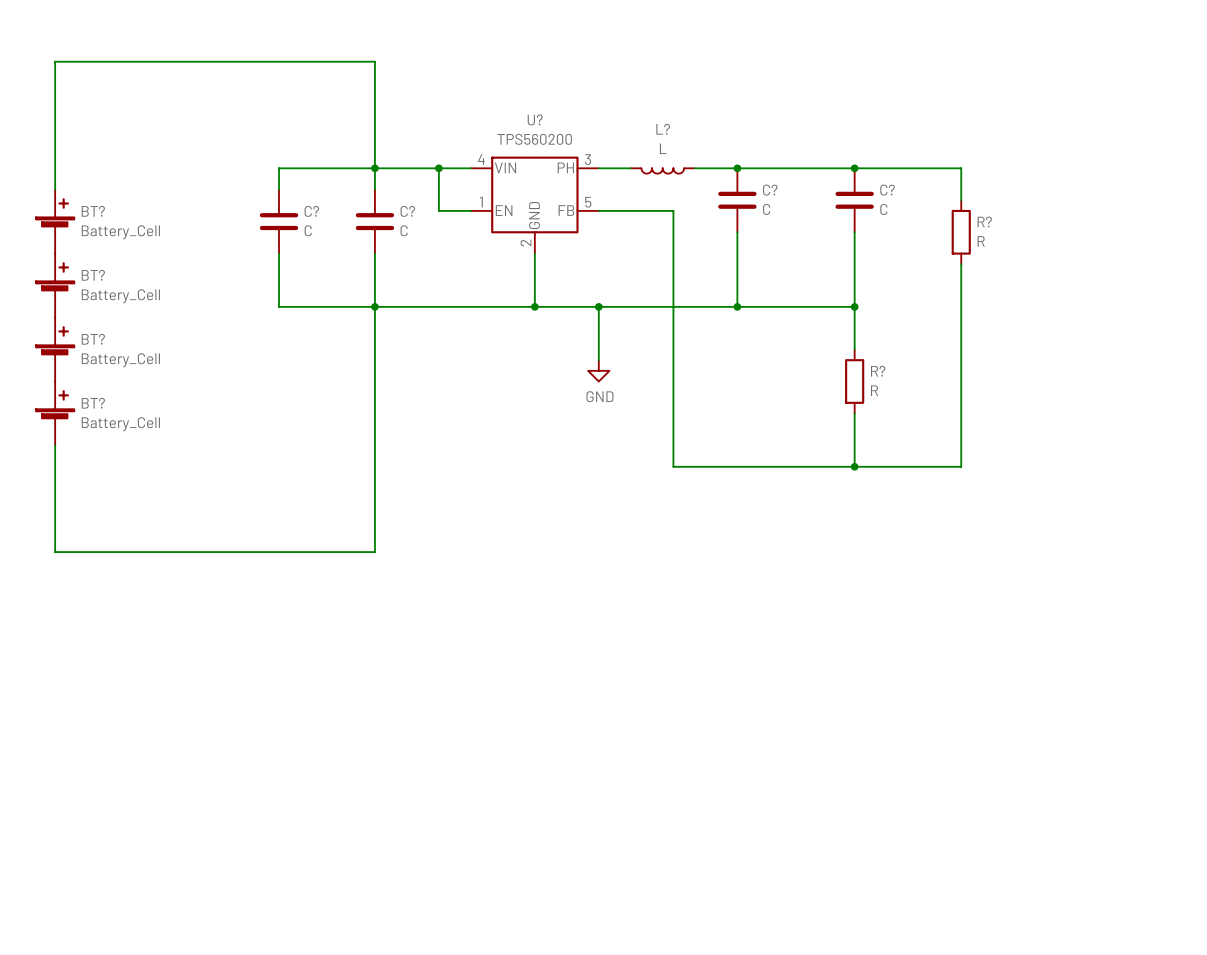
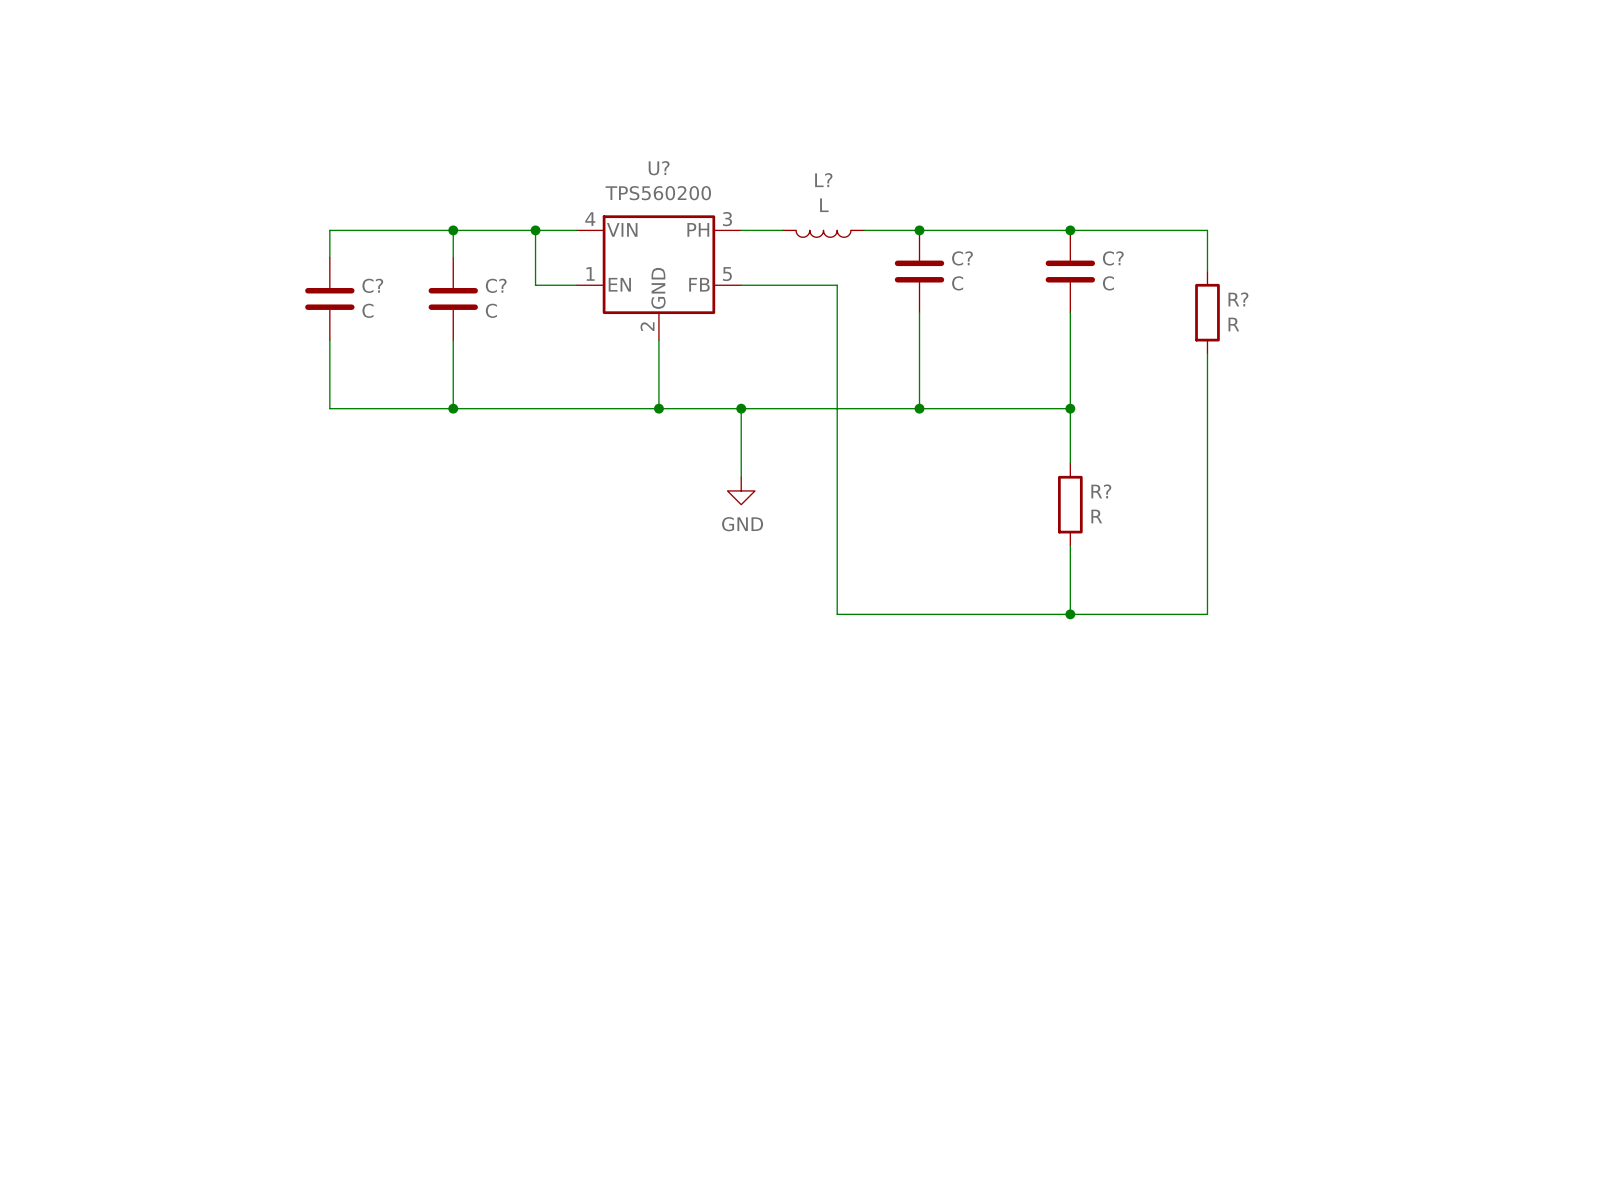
wire: (374, 168) (374, 61) (55, 61) (55, 189) -> none
BT?: Battery_Cell (55, 221) -> none
BT?: Battery_Cell (55, 285) -> none
wire: (374, 306) (374, 552) (55, 552) (55, 445) -> none
BT?: Battery_Cell (55, 349) -> none
BT?: Battery_Cell (55, 413) -> none

